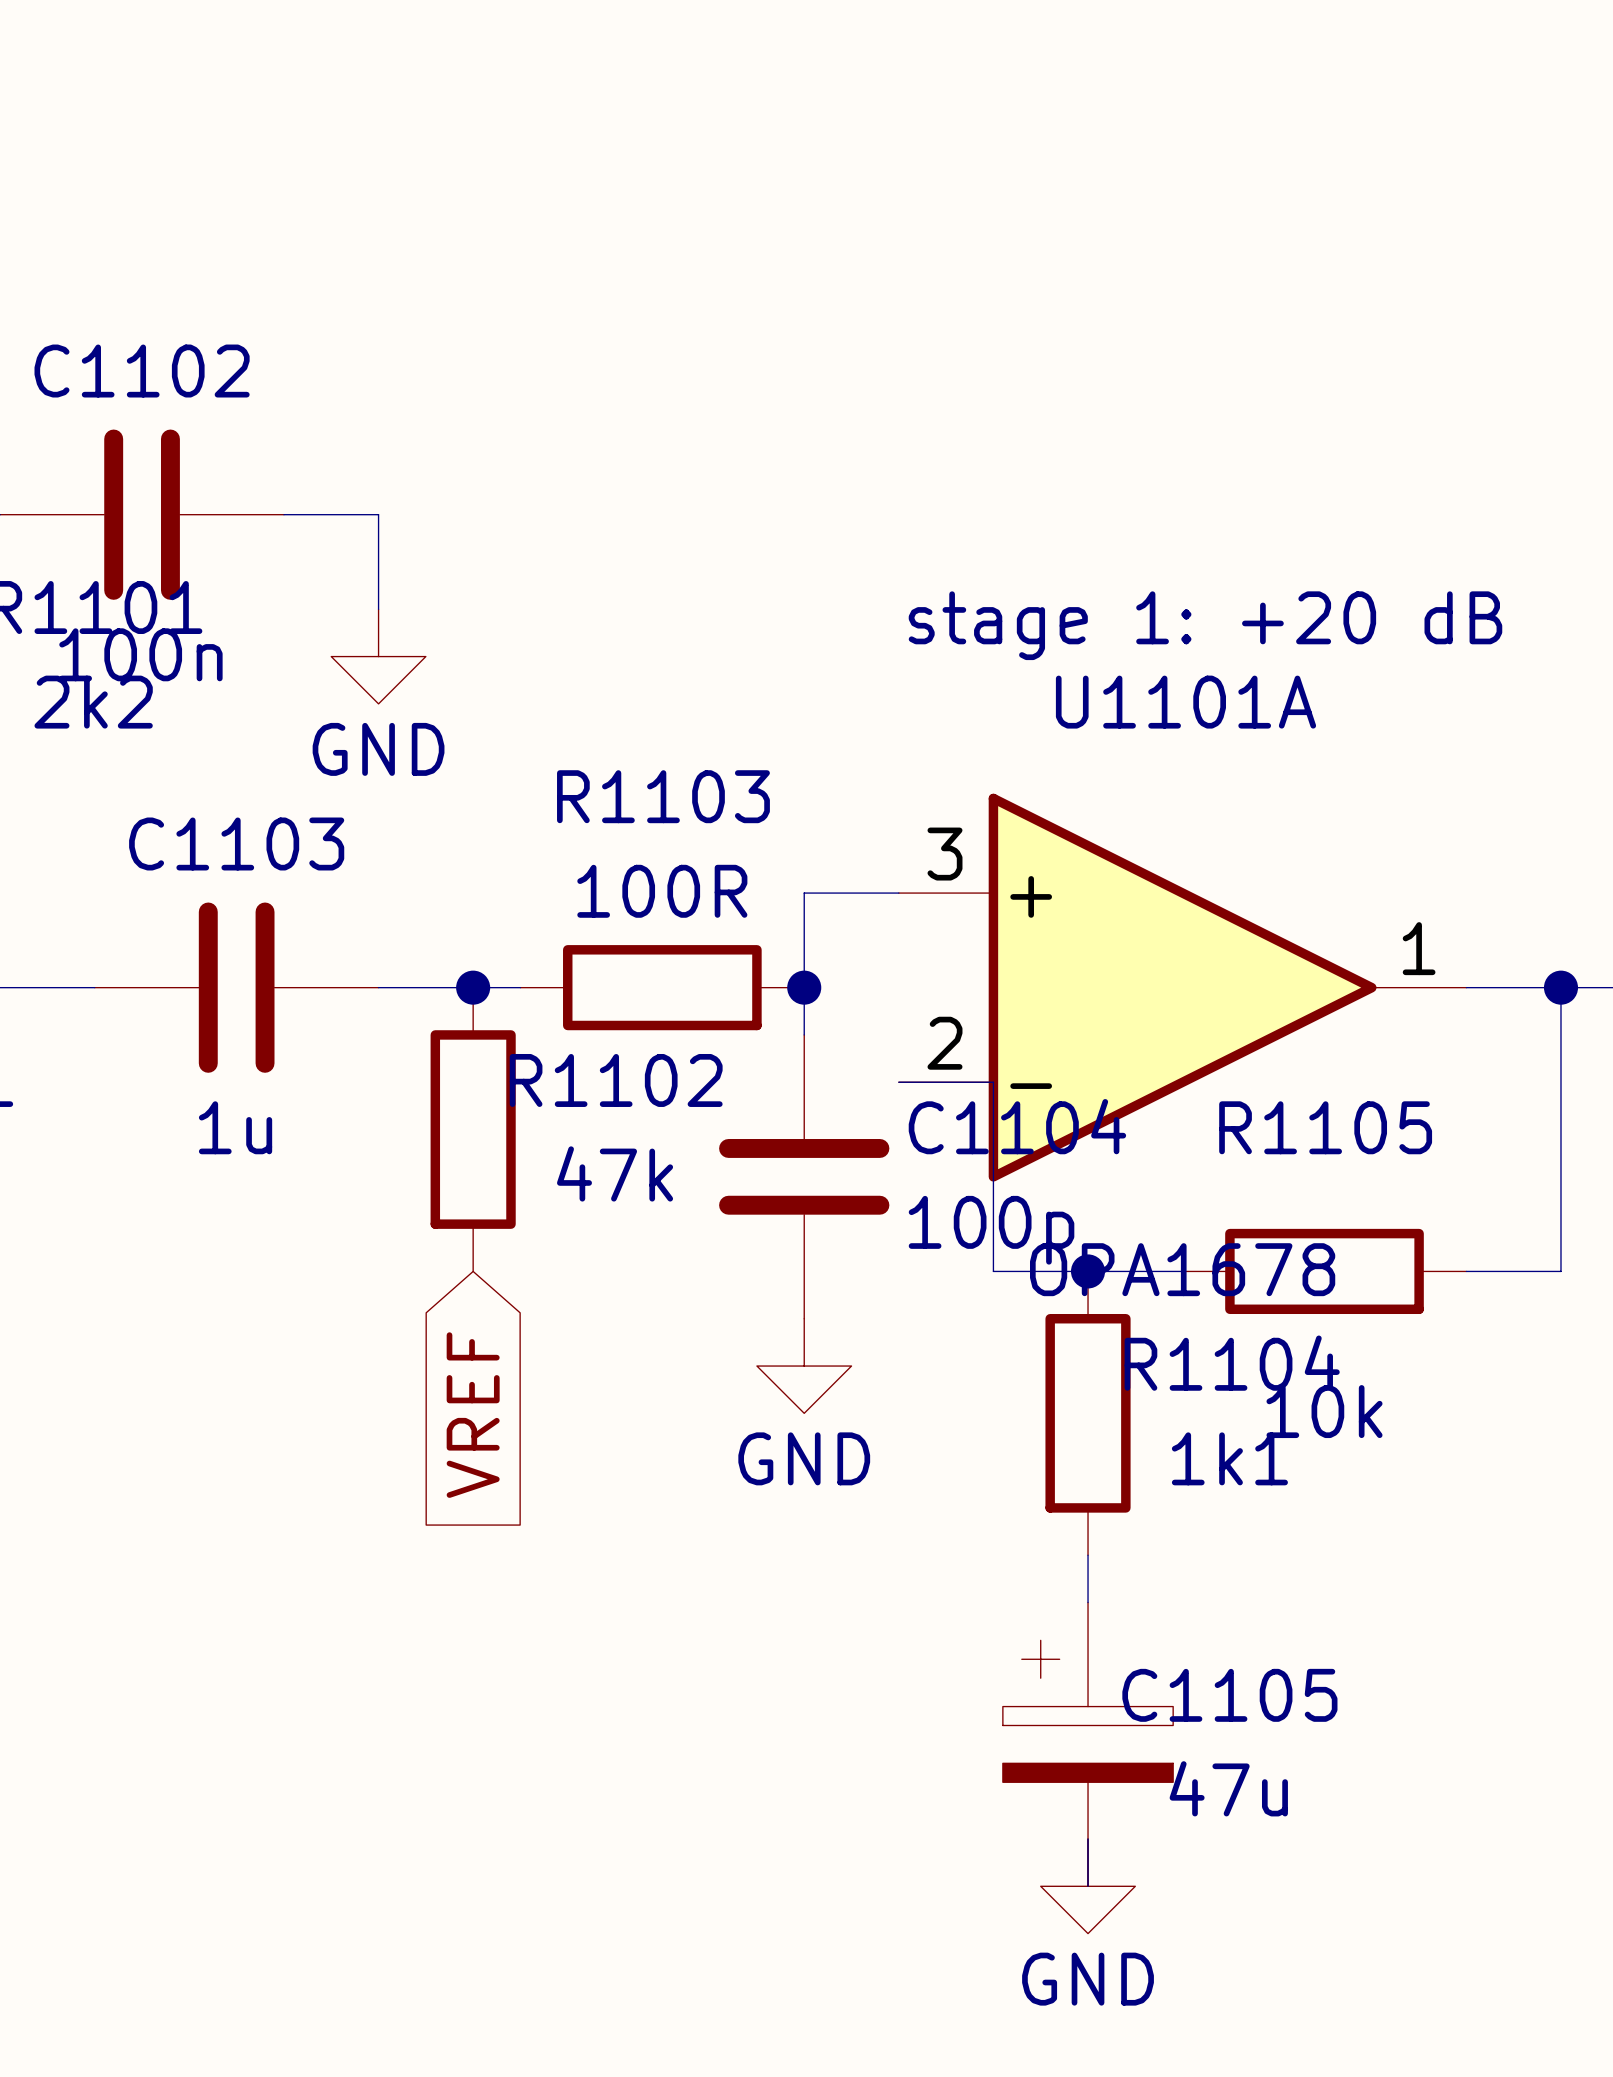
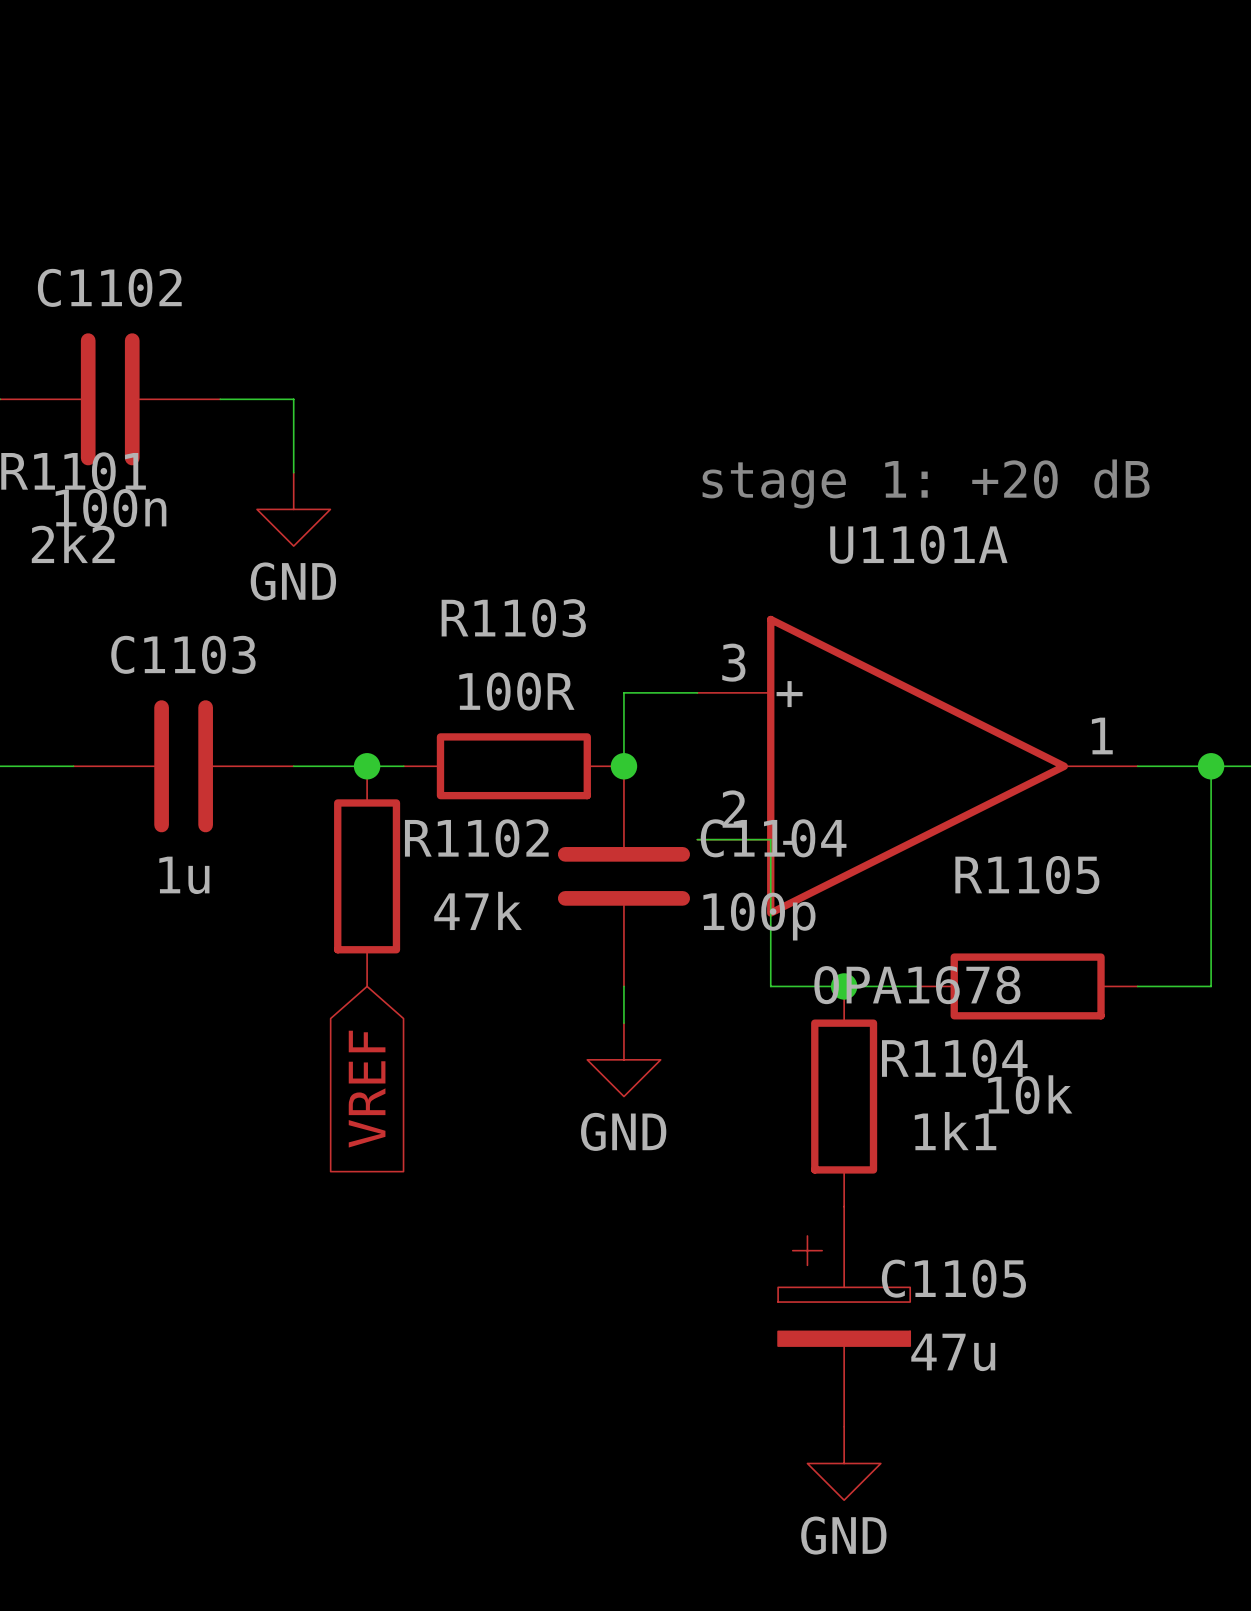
C1104 position: (804, 1176) -> (623, 876)
C1105 position: (1088, 1744) -> (844, 1316)

